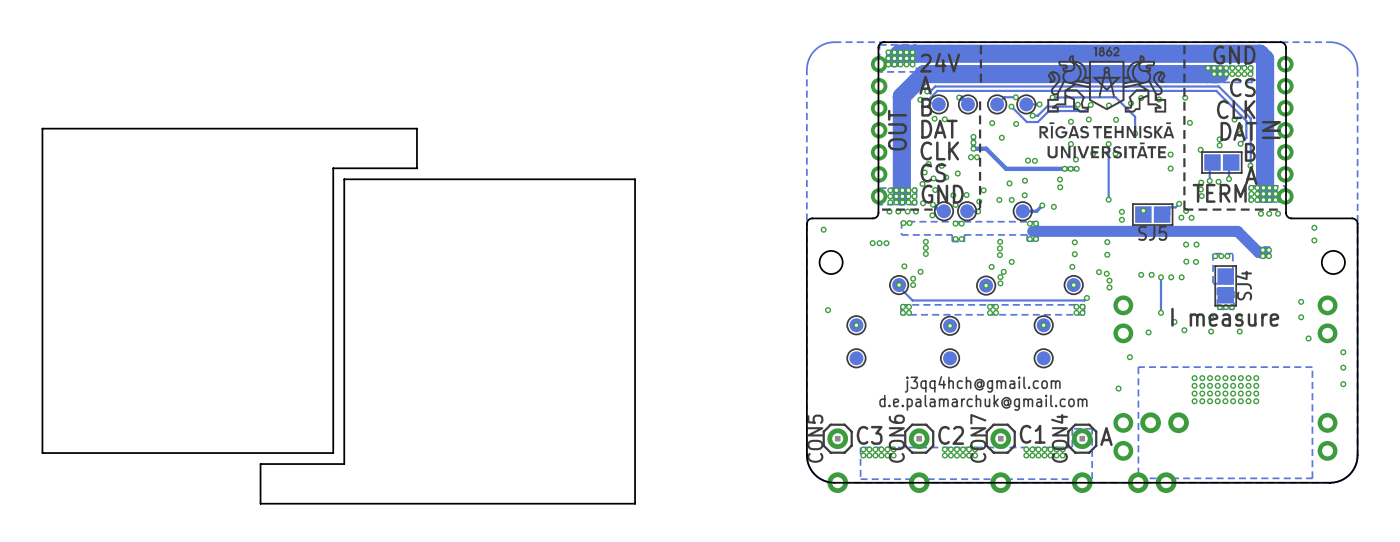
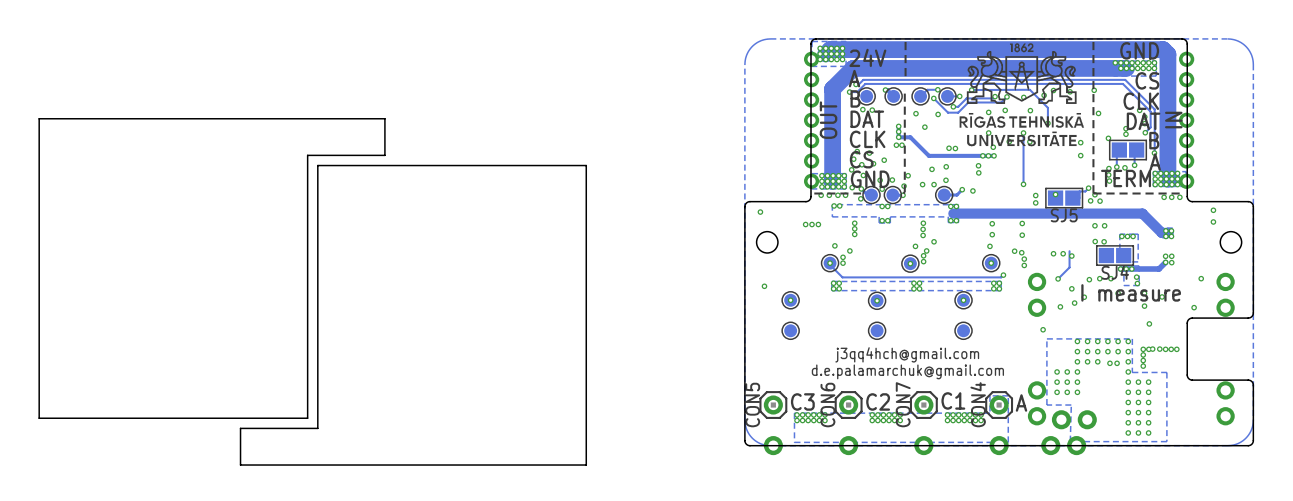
drawing shape: [806, 42, 1358, 483] -> [744, 38, 1254, 446]
track: none -> (1069, 251) (1069, 267) (1058, 278)
track: (1160, 277) (1160, 312) -> none
via: (1171, 277) -> none
via: (1181, 277) -> none
via: none -> (1165, 256)
via: none -> (1171, 256)
track: none -> (1165, 262) (1159, 269) (1120, 269)
via: none -> (1165, 262)
via: none -> (1171, 262)
SJ4 rotation: 0° (1225, 285) -> 90° clockwise (1115, 255)
via: none -> (1120, 269)
via: none -> (1126, 269)
via: none -> (1131, 269)
via: none -> (1136, 277)
via: none -> (1099, 278)
via: none -> (1110, 278)
via: none -> (1058, 278)
via: none -> (1089, 279)
via: (1219, 307) -> none
via: (1225, 307) -> none
via: (1301, 317) -> none
via: none -> (1162, 296)
via: none -> (1074, 303)
via: (1184, 330) -> none
via: (1211, 331) -> none
via: none -> (1194, 307)
via: (1308, 338) -> none
via: none -> (1149, 323)
via: (1343, 352) -> none
zone outline: (1138, 367) (1138, 478) (1159, 478) -> (1050, 338) (1046, 338) (1046, 405) (1071, 405) (1070, 441)
zone outline: (1226, 367) (1312, 367) (1312, 478) (1263, 478) -> (1132, 338) (1132, 372) (1166, 372) (1166, 441)
via: (1343, 367) -> none
via: none -> (1077, 341)
via: none -> (1087, 341)
via: none -> (1097, 341)
via: none -> (1107, 341)
via: none -> (1118, 341)
via: none -> (1128, 341)
via: (1194, 378) -> none
via: (1202, 378) -> none
via: (1210, 378) -> none
via: (1217, 378) -> none
via: (1225, 378) -> none
via: (1233, 378) -> none
via: none -> (1143, 349)
via: (1240, 378) -> none
via: none -> (1148, 349)
via: none -> (1165, 349)
via: none -> (1171, 349)
via: none -> (1176, 349)
via: none -> (1077, 351)
via: none -> (1087, 351)
via: none -> (1097, 351)
via: none -> (1107, 351)
via: none -> (1118, 351)
via: none -> (1128, 351)
via: none -> (1143, 354)
via: (1343, 384) -> none
via: (1194, 385) -> none
via: (1202, 385) -> none
via: (1210, 385) -> none
via: (1217, 385) -> none
via: (1225, 385) -> none
via: (1233, 385) -> none
via: (1240, 385) -> none
via: (1248, 385) -> none
via: (1256, 385) -> none
via: (1118, 388) -> none
via: none -> (1143, 360)
via: none -> (1077, 361)
via: none -> (1087, 361)
via: none -> (1097, 361)
via: none -> (1128, 361)
via: (1194, 393) -> none
via: (1217, 393) -> none
via: (1225, 393) -> none
via: (1233, 393) -> none
via: (1240, 393) -> none
via: (1248, 393) -> none
via: (1256, 393) -> none
via: none -> (1143, 366)
via: (1194, 401) -> none
via: (1202, 401) -> none
via: (1210, 401) -> none
via: (1217, 401) -> none
via: (1225, 401) -> none
via: (1233, 401) -> none
via: (1240, 401) -> none
via: (1248, 401) -> none
via: (1256, 401) -> none
via: none -> (1057, 371)
via: none -> (1067, 371)
via: none -> (1077, 371)
via: none -> (1128, 371)
via: none -> (1057, 382)
via: none -> (1067, 382)
via: none -> (1077, 382)
via: none -> (1128, 382)
via: none -> (1138, 382)
via: none -> (1148, 382)
part position: (1164, 422) -> (1074, 419)
via: none -> (1057, 392)
via: none -> (1067, 392)
via: none -> (1077, 392)
via: none -> (1128, 392)
via: none -> (1138, 392)
via: none -> (1148, 392)
via: none -> (1128, 402)
via: none -> (1138, 402)
via: none -> (1148, 402)
via: none -> (1128, 412)
via: none -> (1138, 412)
via: none -> (1148, 412)
via: none -> (1128, 422)
via: none -> (1138, 422)
via: none -> (1148, 422)
via: none -> (1128, 432)
via: none -> (1138, 432)
via: none -> (1148, 432)

